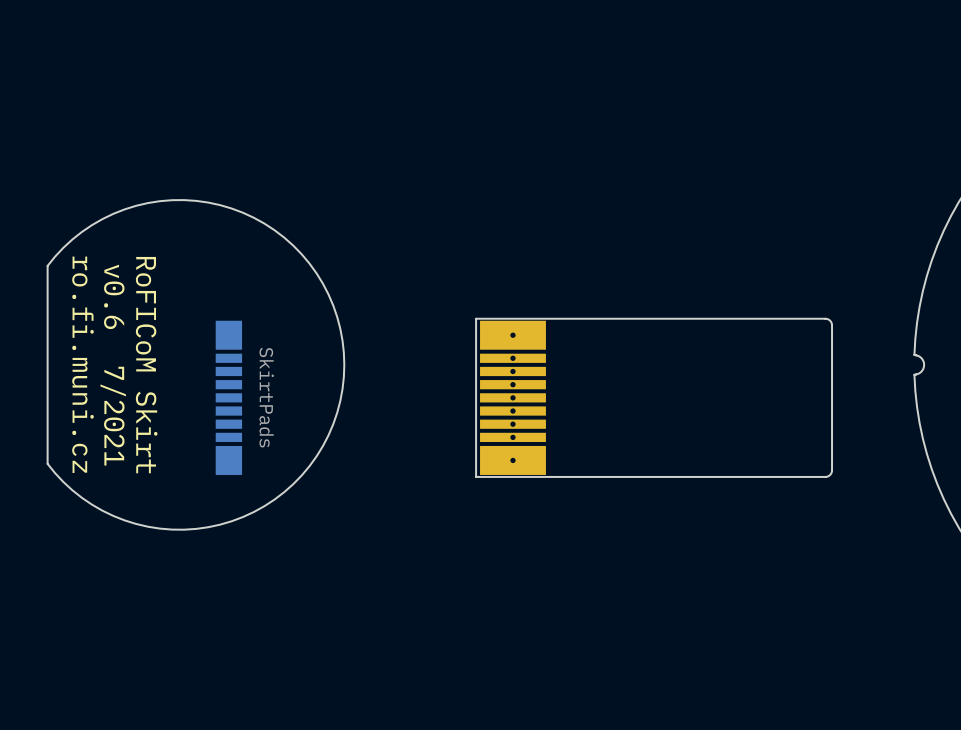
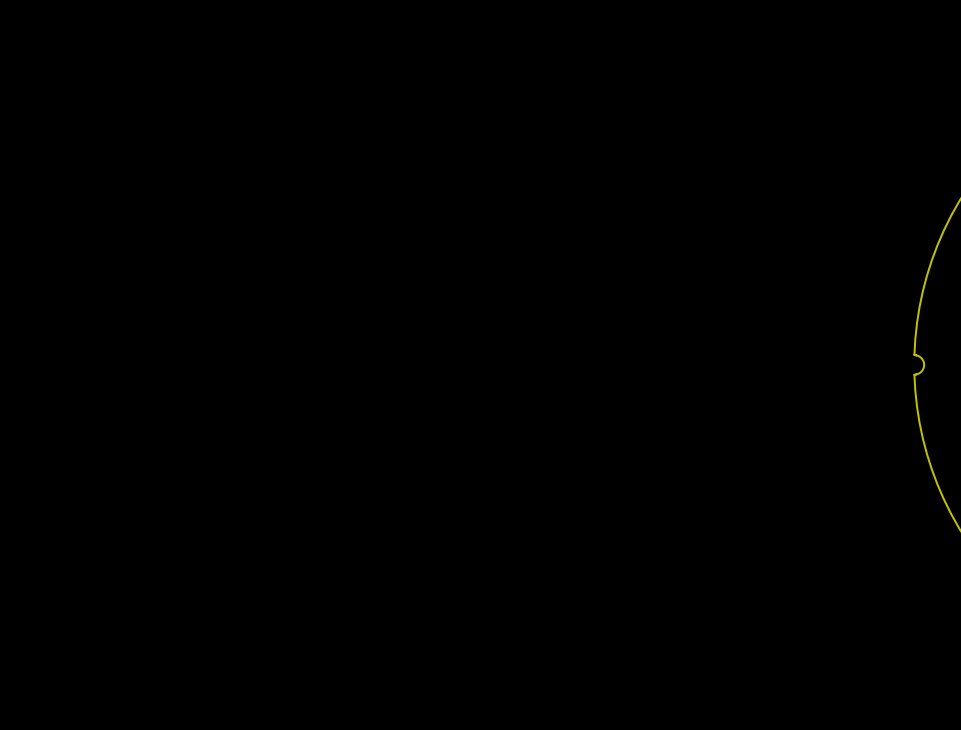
board edge: (47, 265) (47, 463) (63, 482) (81, 497) (113, 515) (147, 526) (184, 529) (208, 527) (242, 517) (264, 506) (284, 492) (309, 466) (323, 445) (337, 412) (343, 376) (342, 340) (333, 305) (323, 283) (301, 254) (274, 230) (242, 212) (220, 205) (184, 200) (159, 201) (124, 209) (102, 219) (72, 239) (47, 265) -> none
board edge: (825, 318) (476, 318) (476, 476) (827, 476) (832, 470) (832, 325) (830, 320) (825, 318) -> none
text: ro.fi.muni.cz (82, 364) -> none
text: v0.6 7/2021 (113, 365) -> none
text: RoFICoM Skirt (146, 365) -> none
part: SkirtPads (228, 397) -> none
part: (512, 397) -> none

